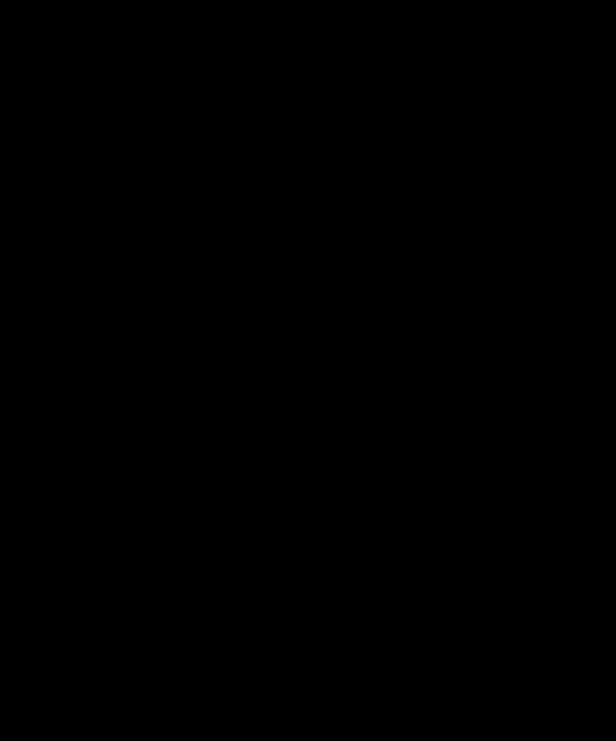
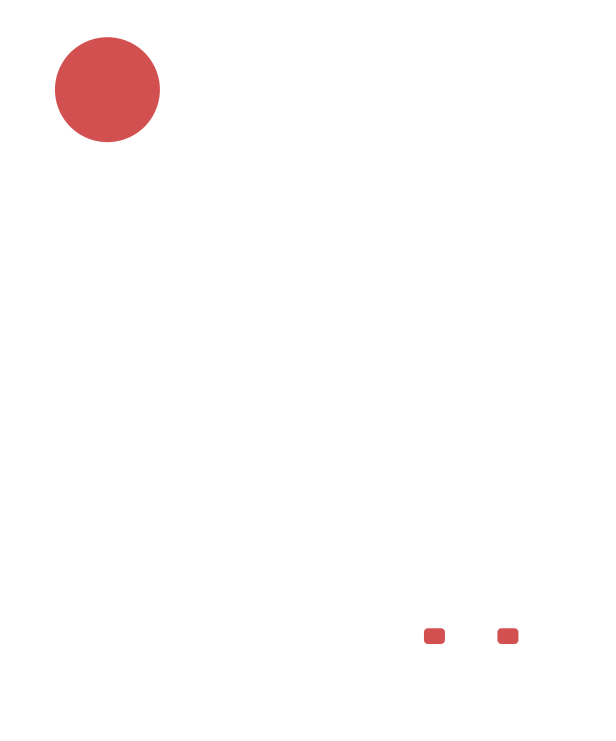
part: none -> (107, 89)
part: none -> (471, 636)

